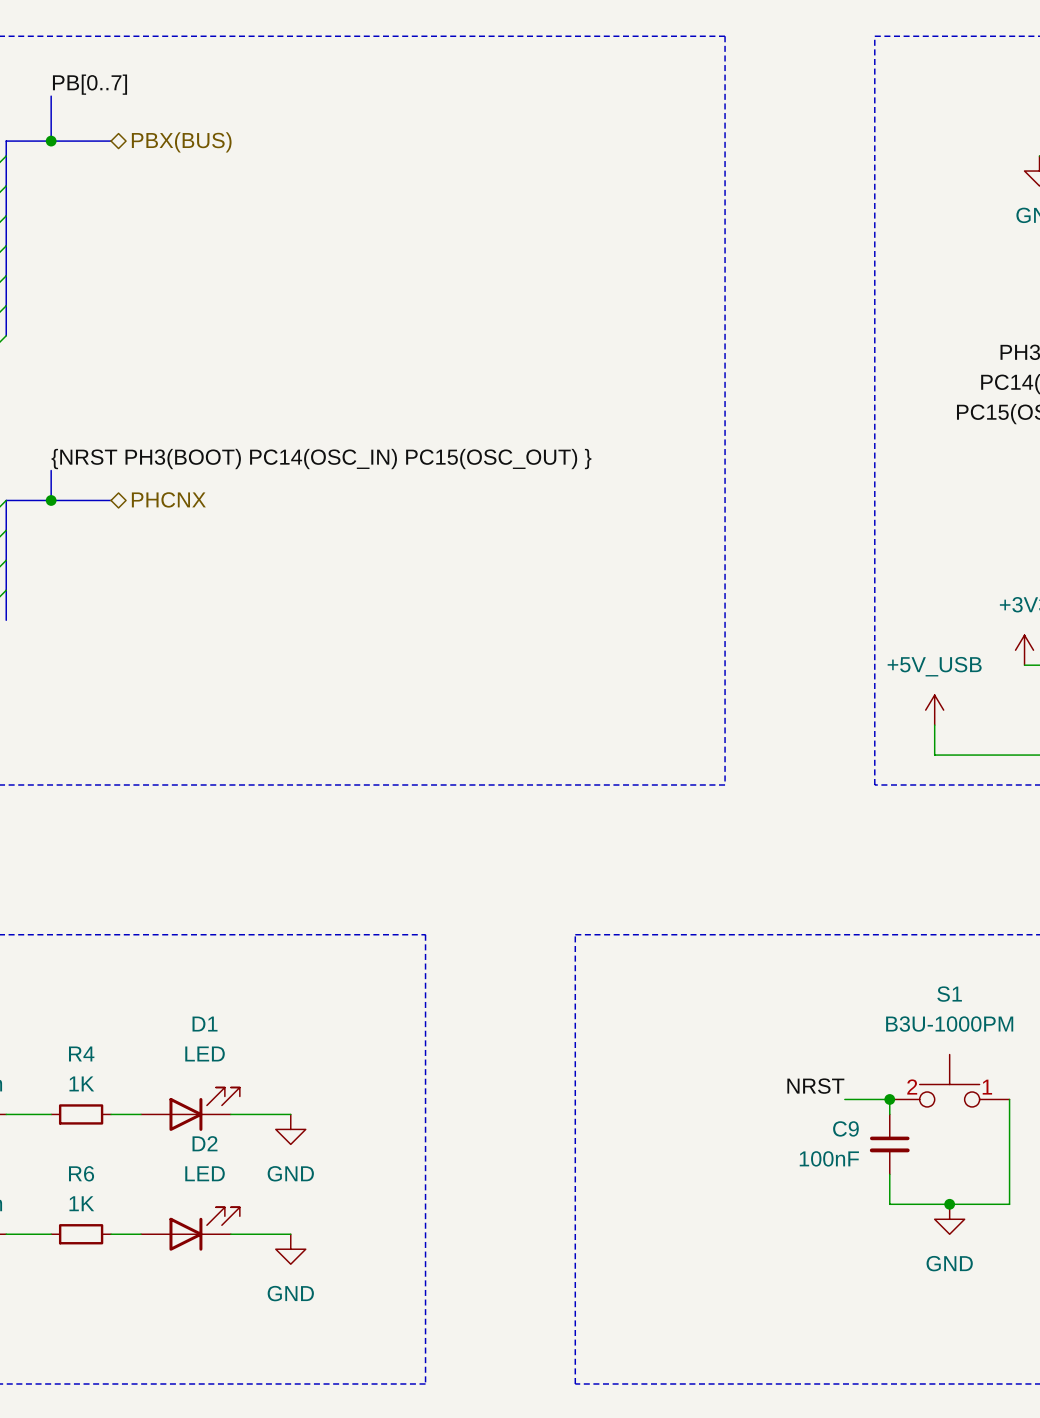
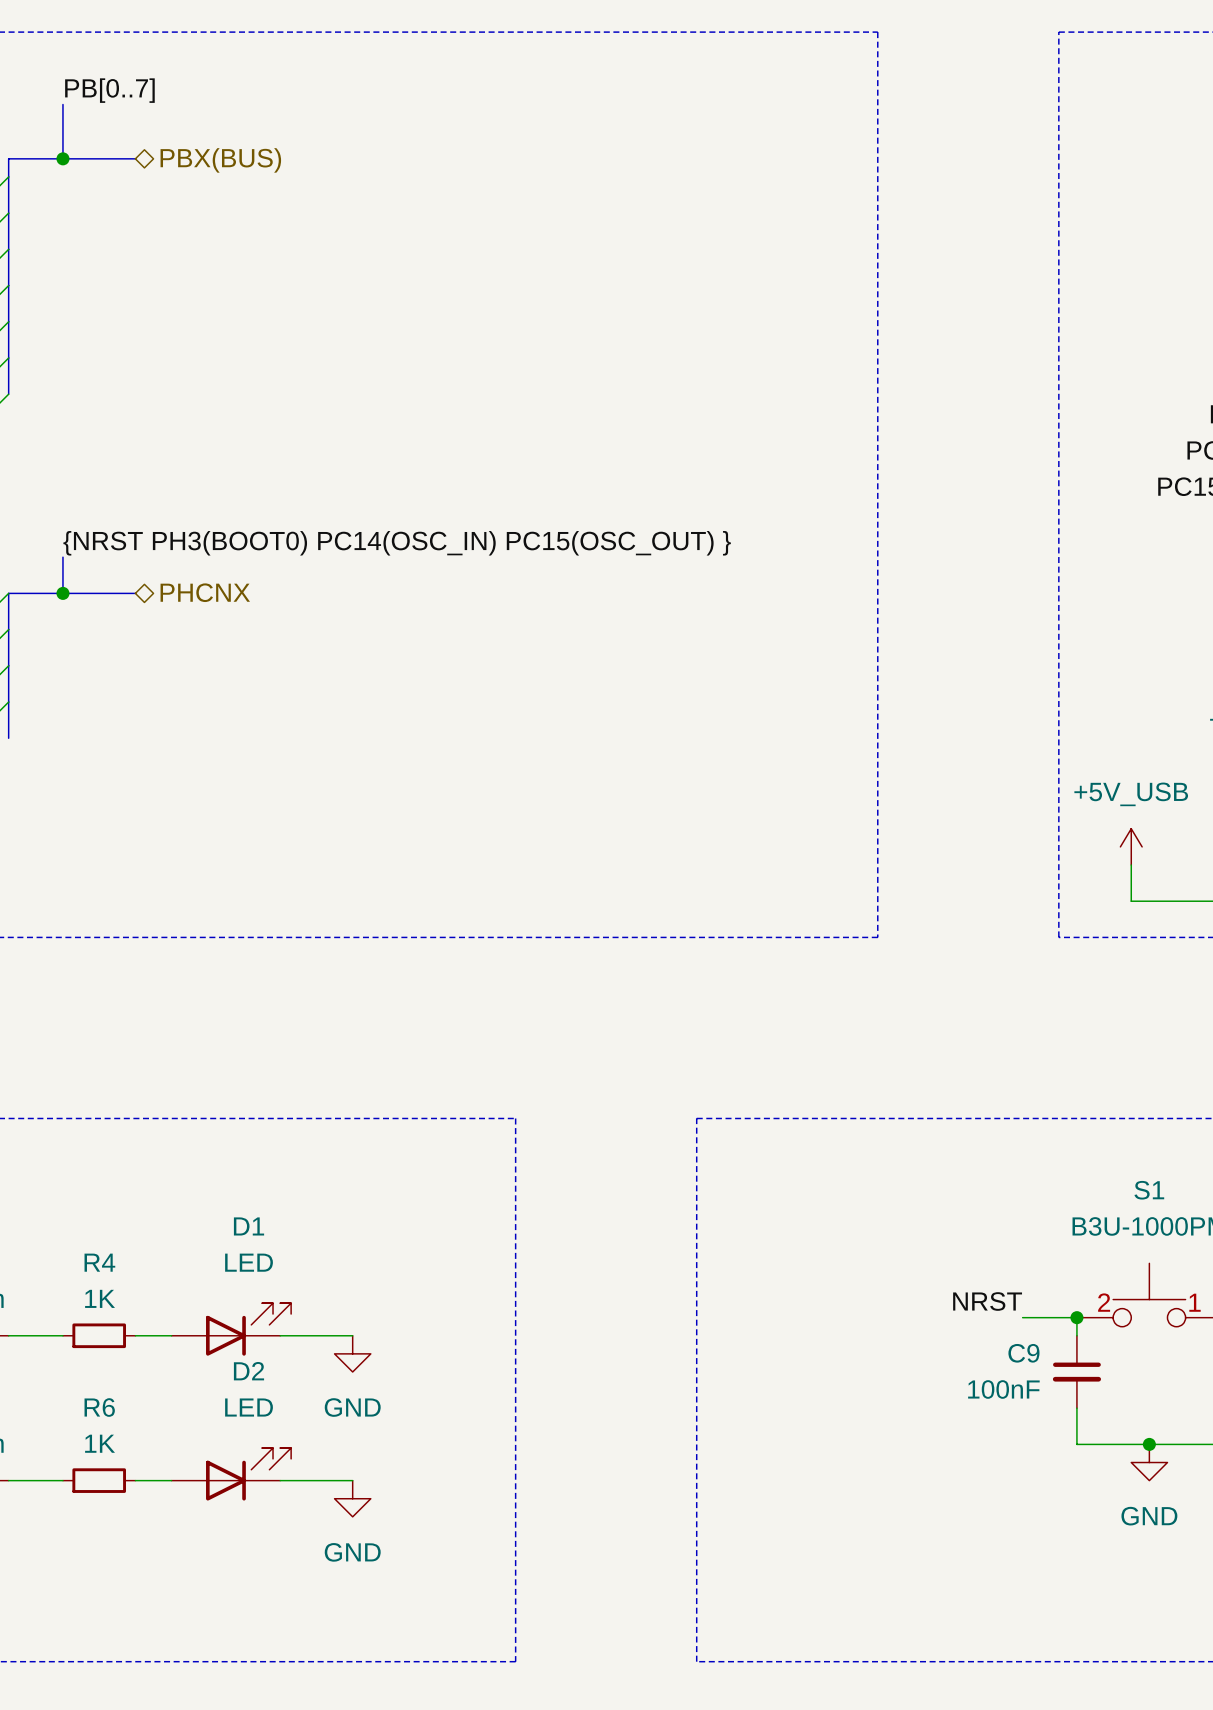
label: {NRST PH3(BOOT) PC14(OSC_IN) PC15(OSC_OUT) } (321, 459) -> {NRST PH3(BOOT0) PC14(OSC_IN) PC15(OSC_OUT) } (397, 543)

